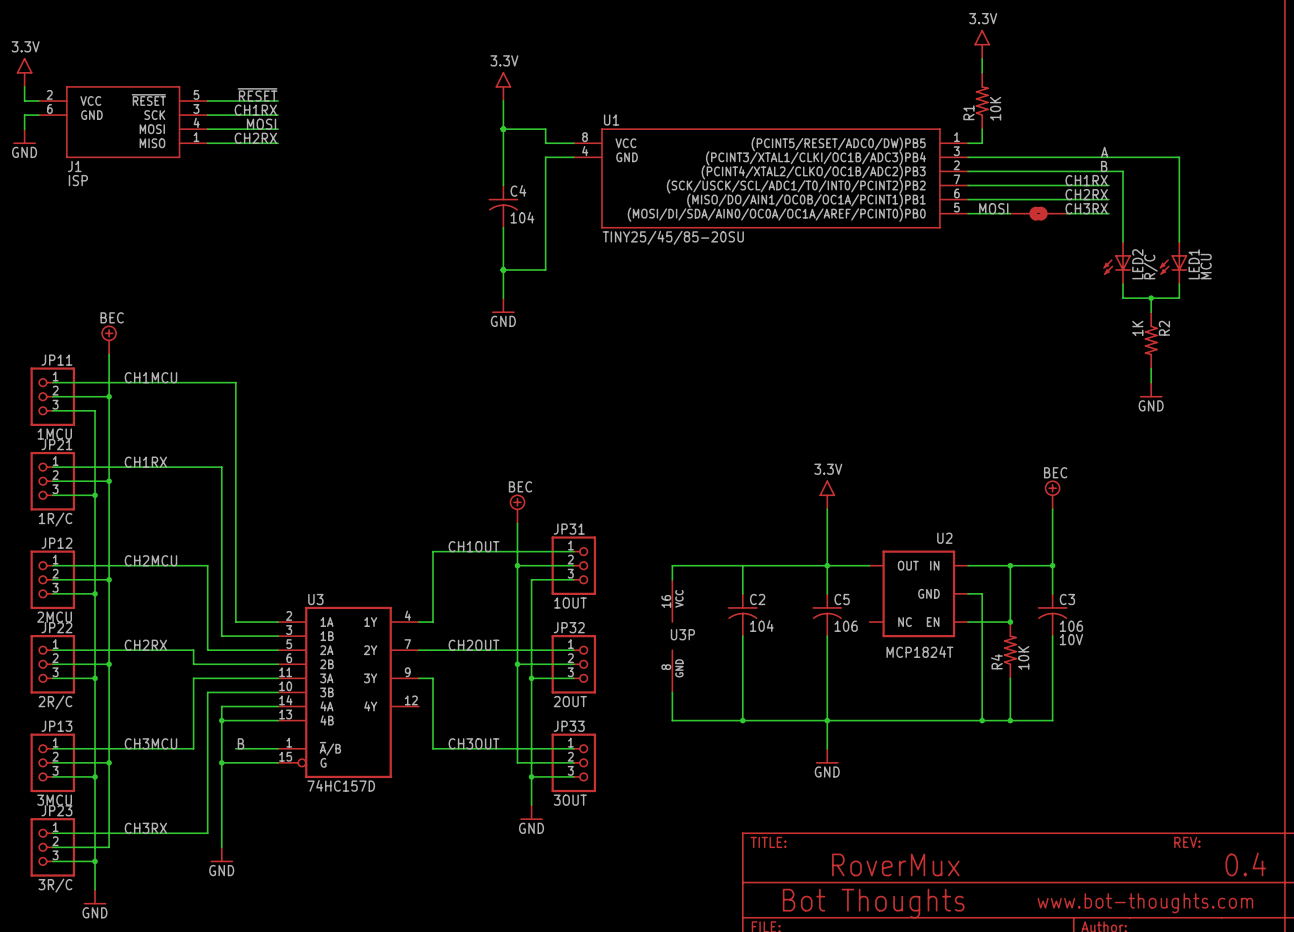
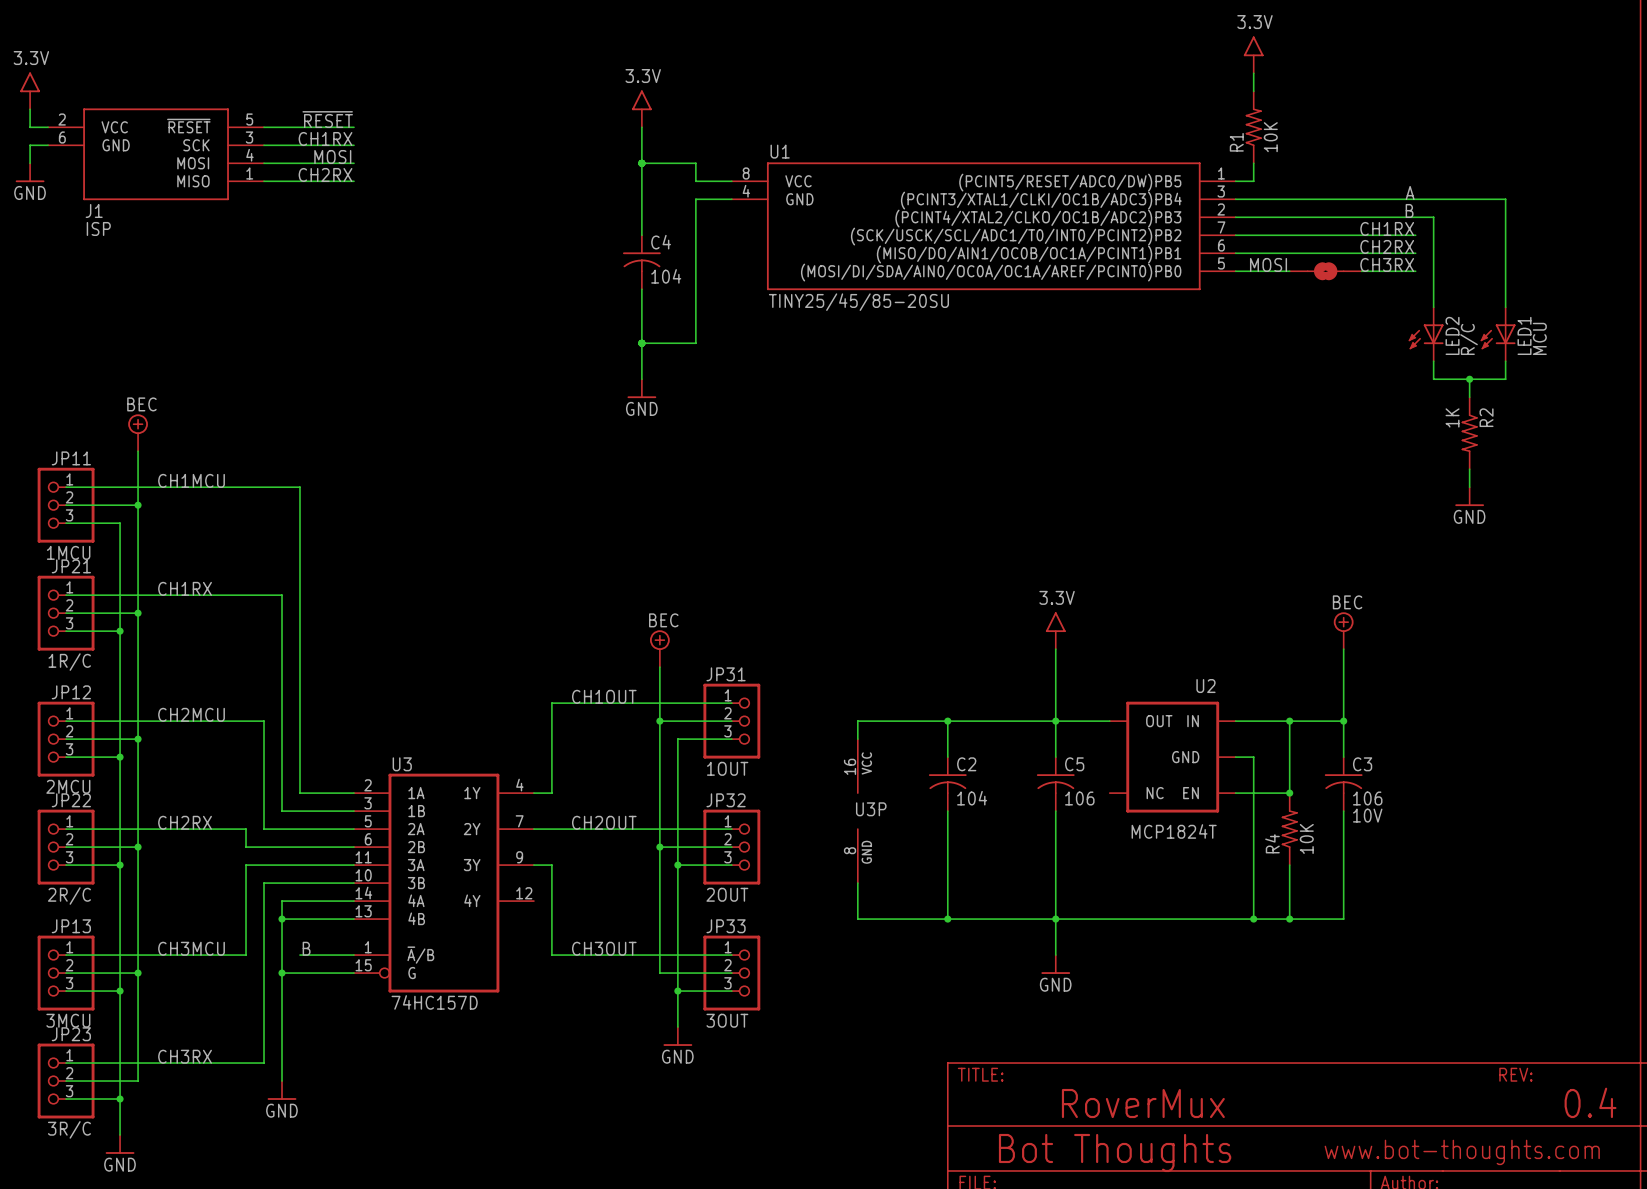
junction: none -> (947, 721)

